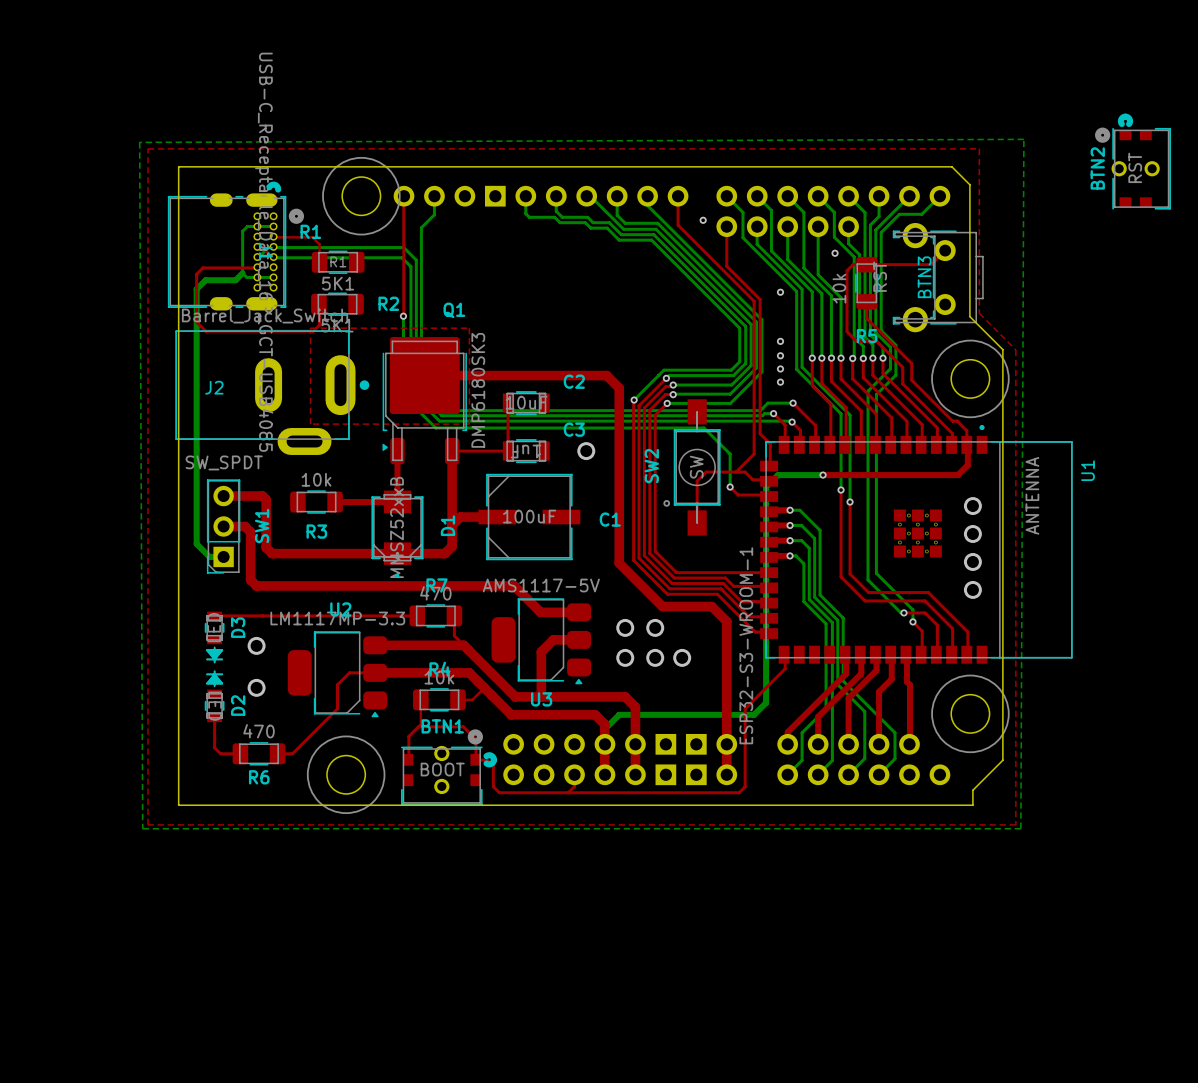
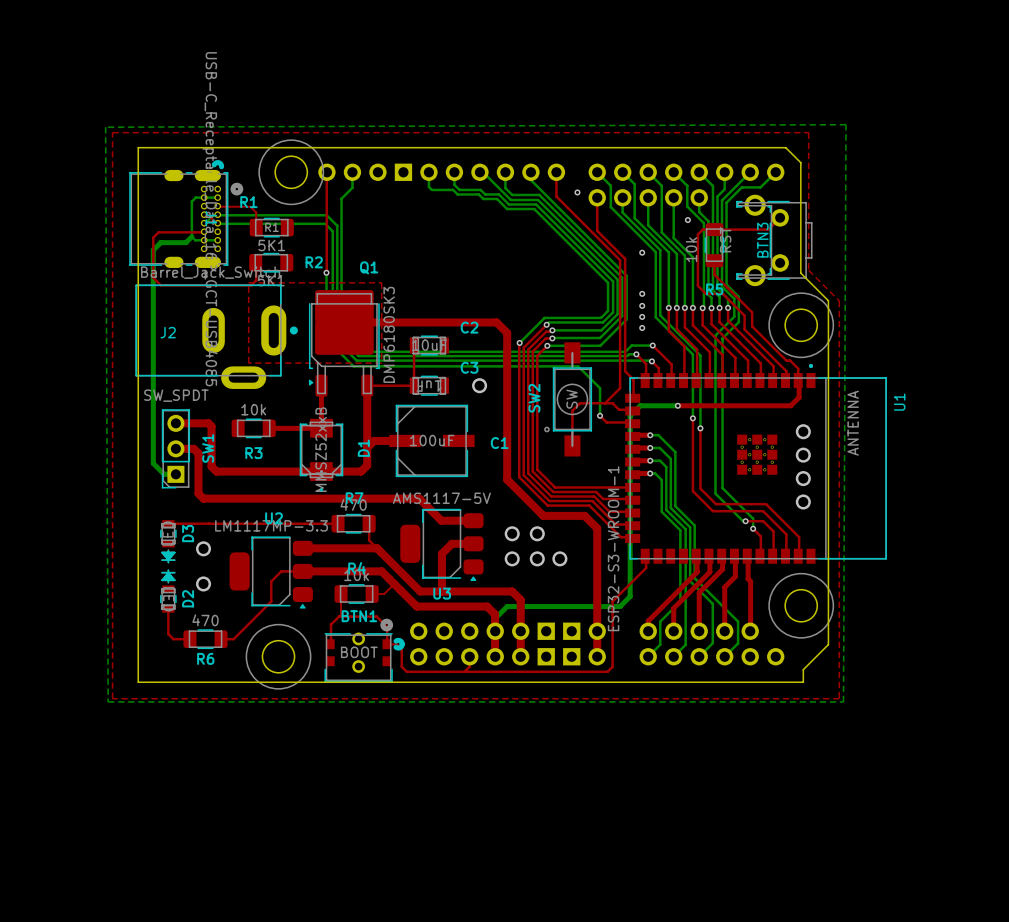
BTN2: RST (1133, 161) -> none

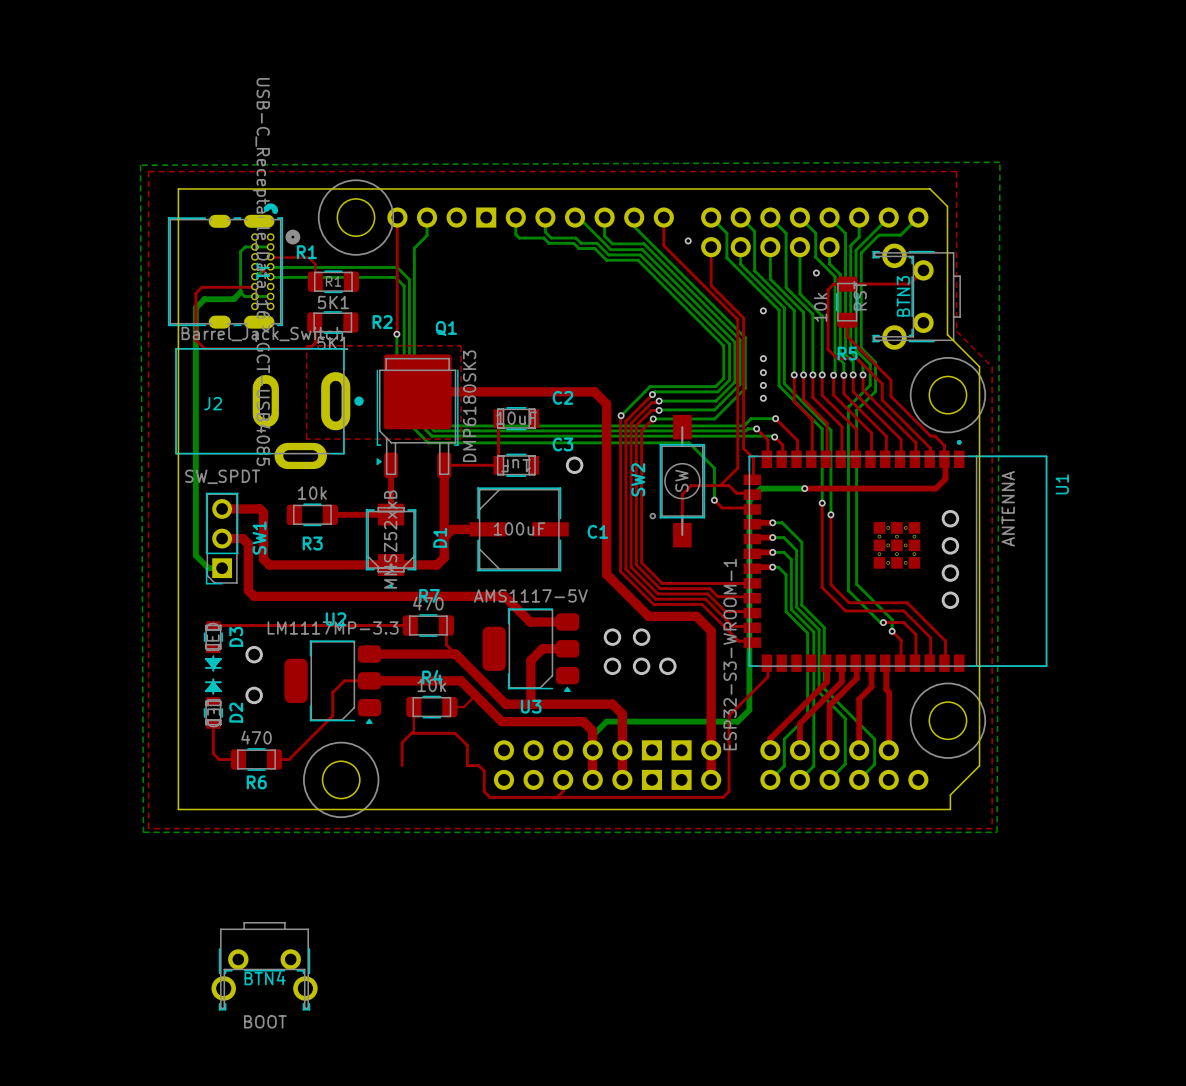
BTN1: BOOT (364, 650) -> none
BTN4: none -> BOOT (264, 966)

